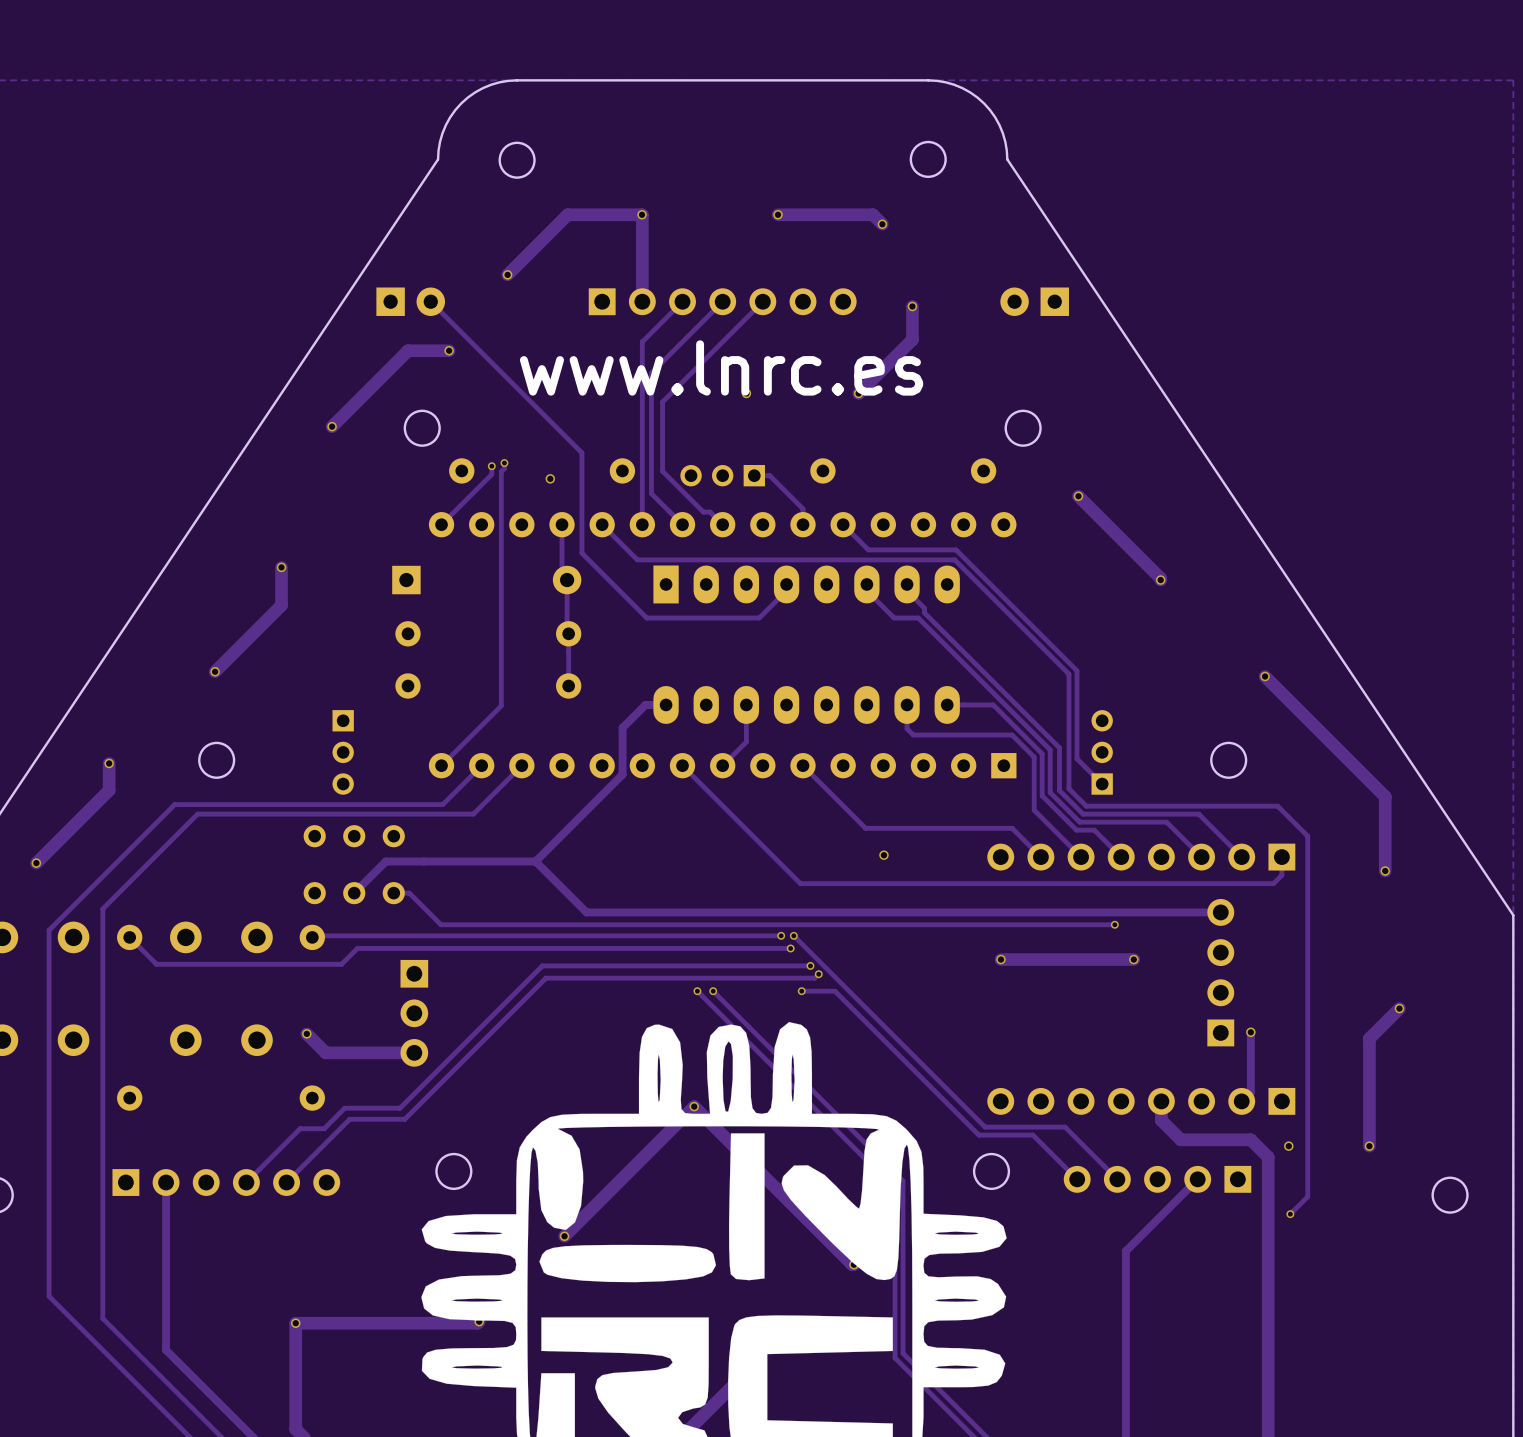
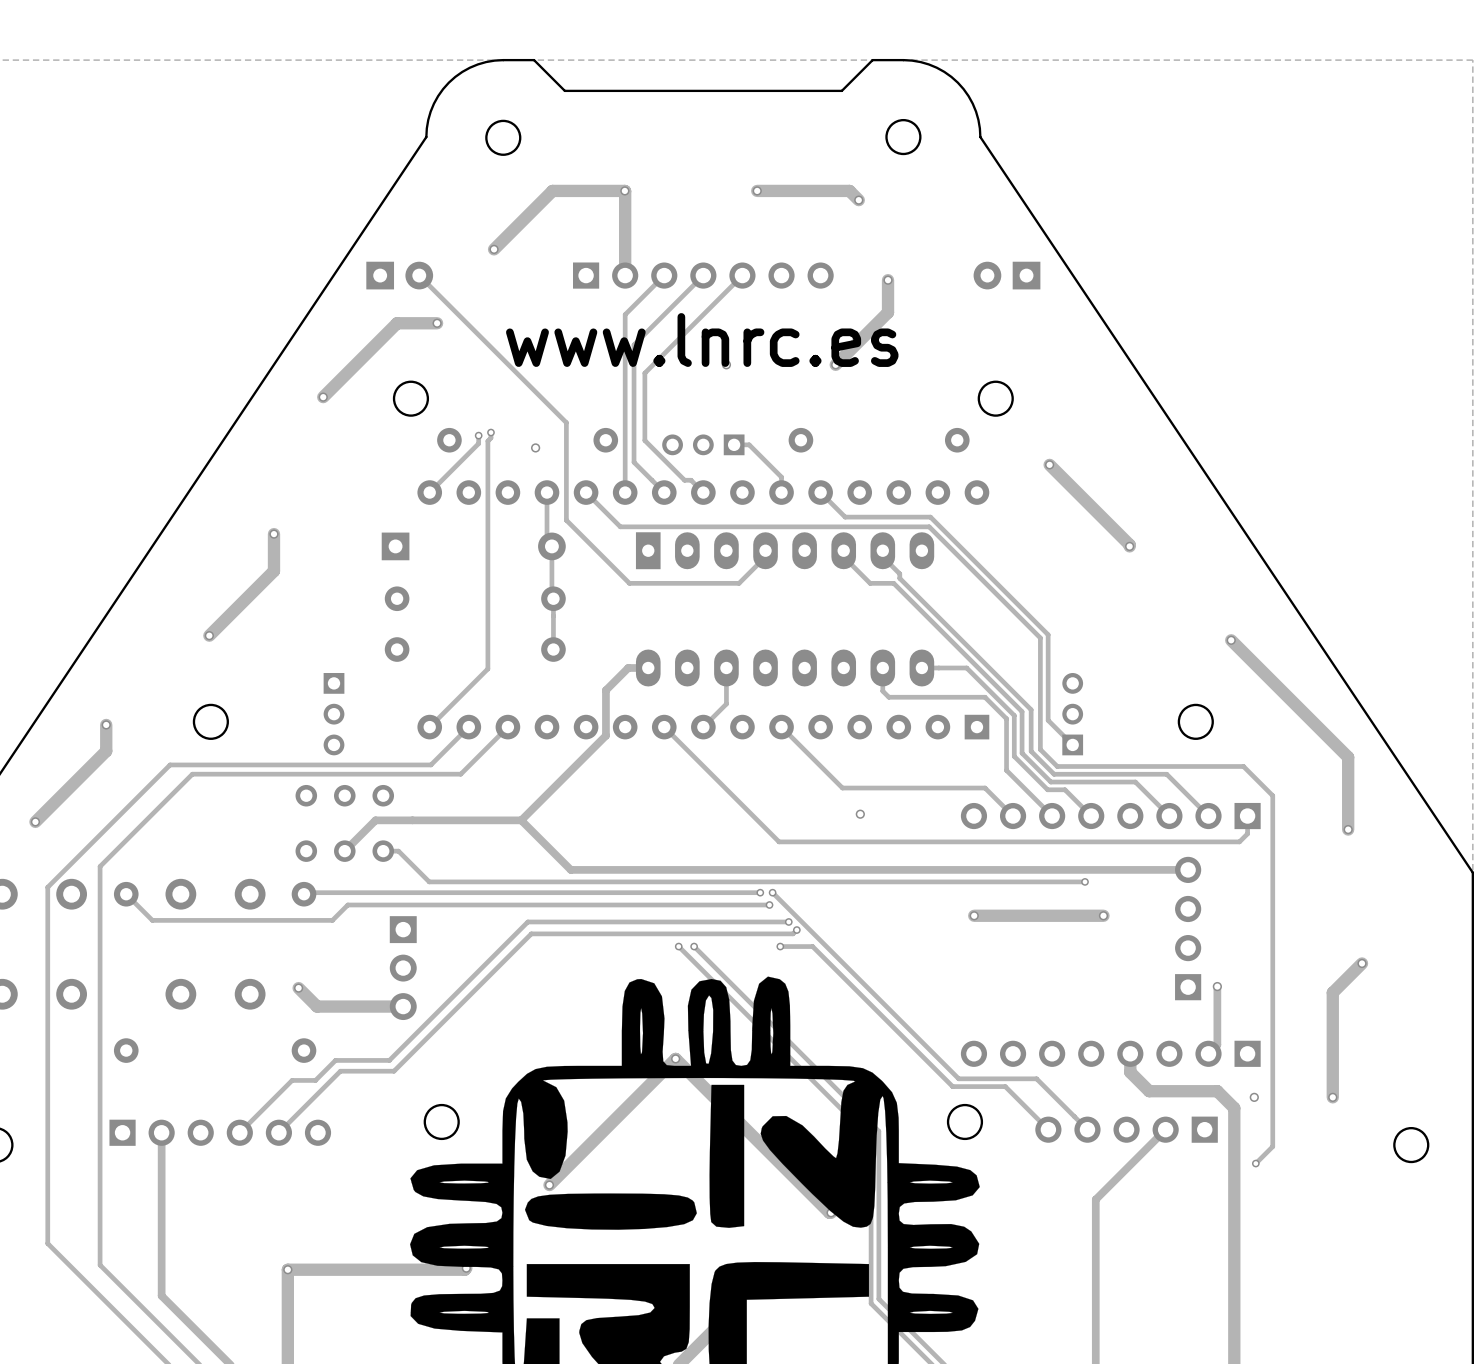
board edge: (896, 80) (548, 80) -> (872, 60) (841, 90) (564, 90) (534, 60)

